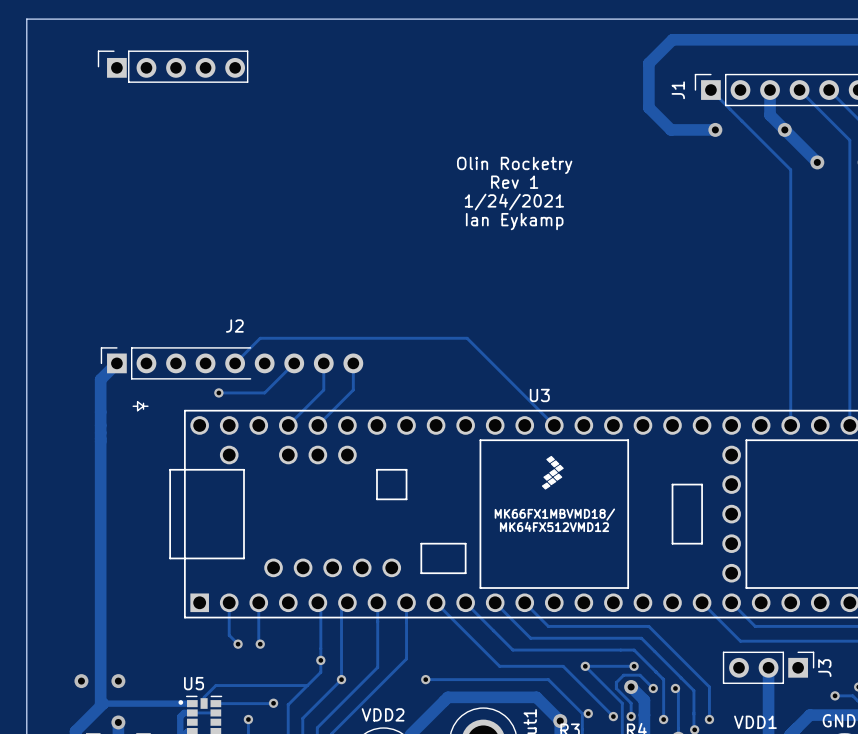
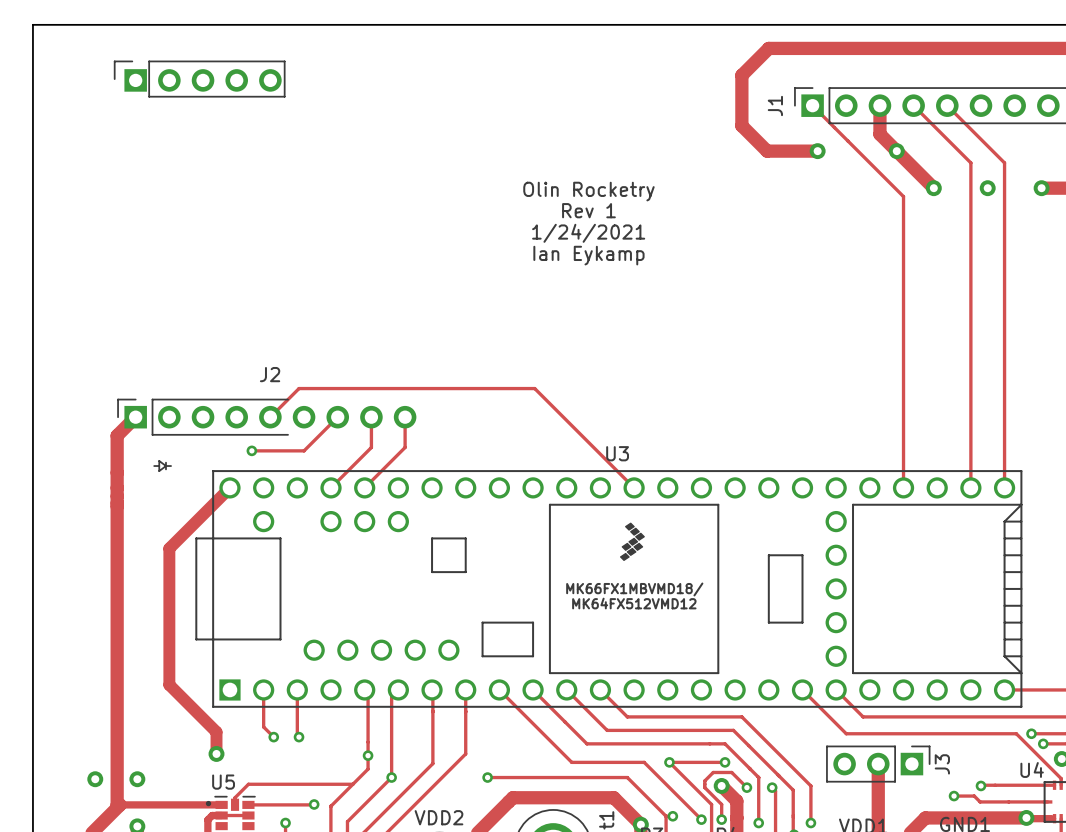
track: none -> (229, 487) (169, 548) (169, 684) (216, 732) (216, 753)
via: none -> (216, 753)

